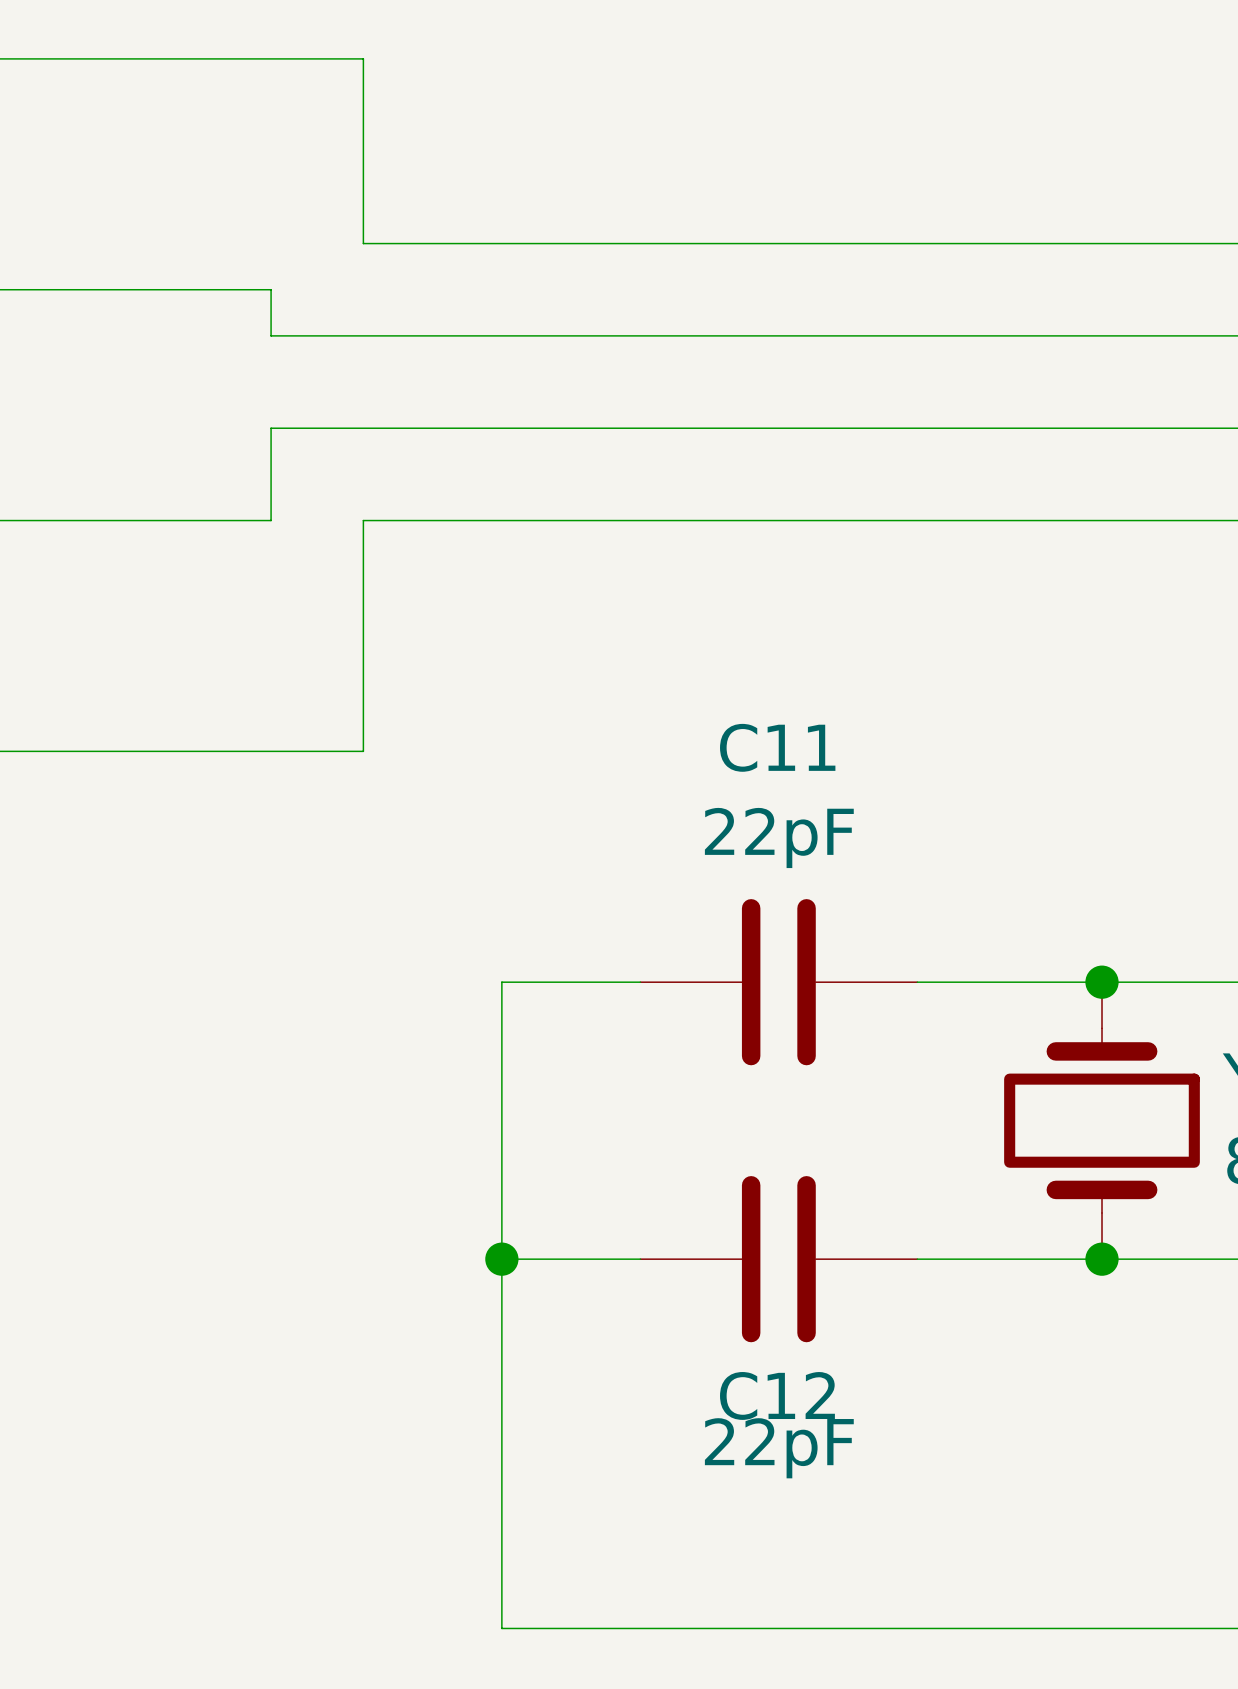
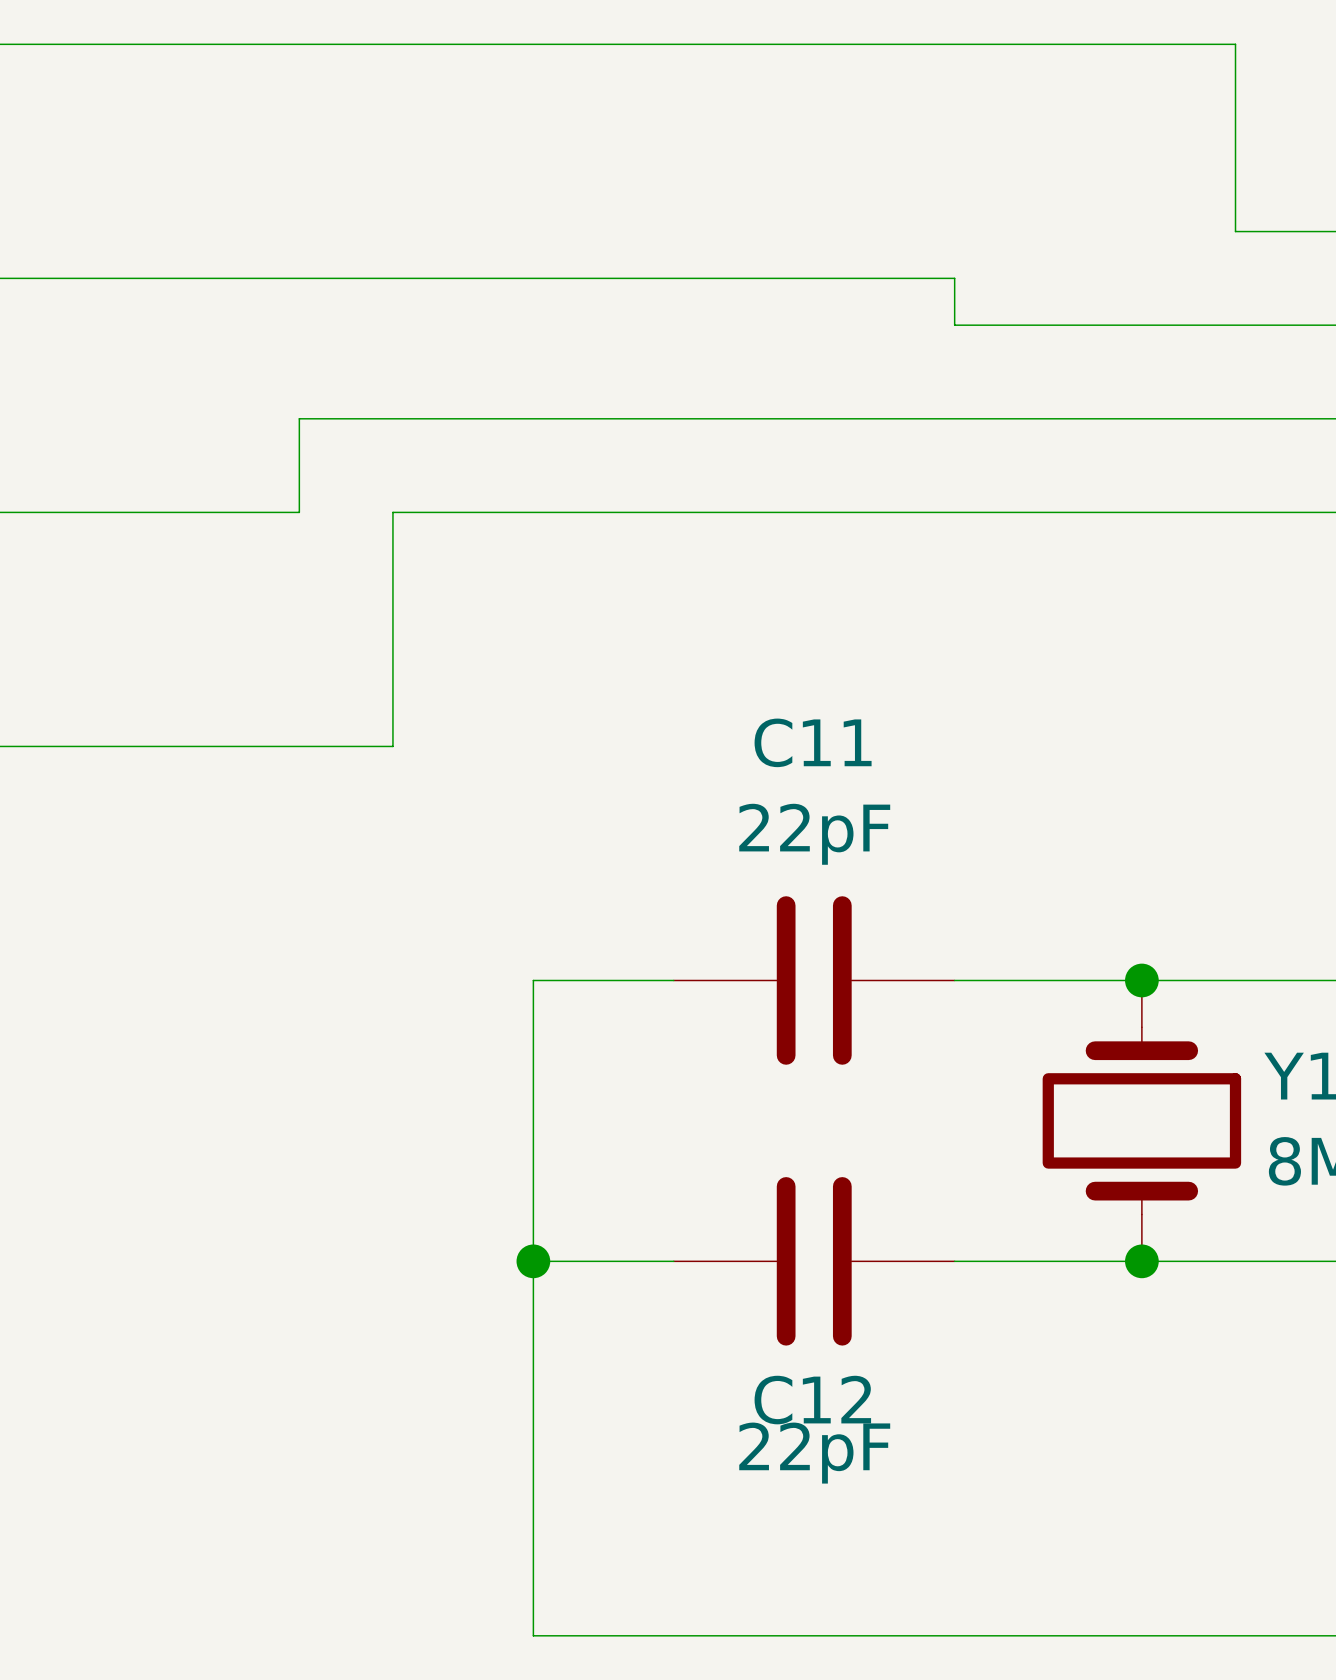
wire: (363, 58) (363, 243) (1194, 243) -> (392, 44) (1235, 44) (1235, 231)
wire: (271, 289) (271, 335) (917, 335) -> (299, 278) (954, 278) (954, 325)

